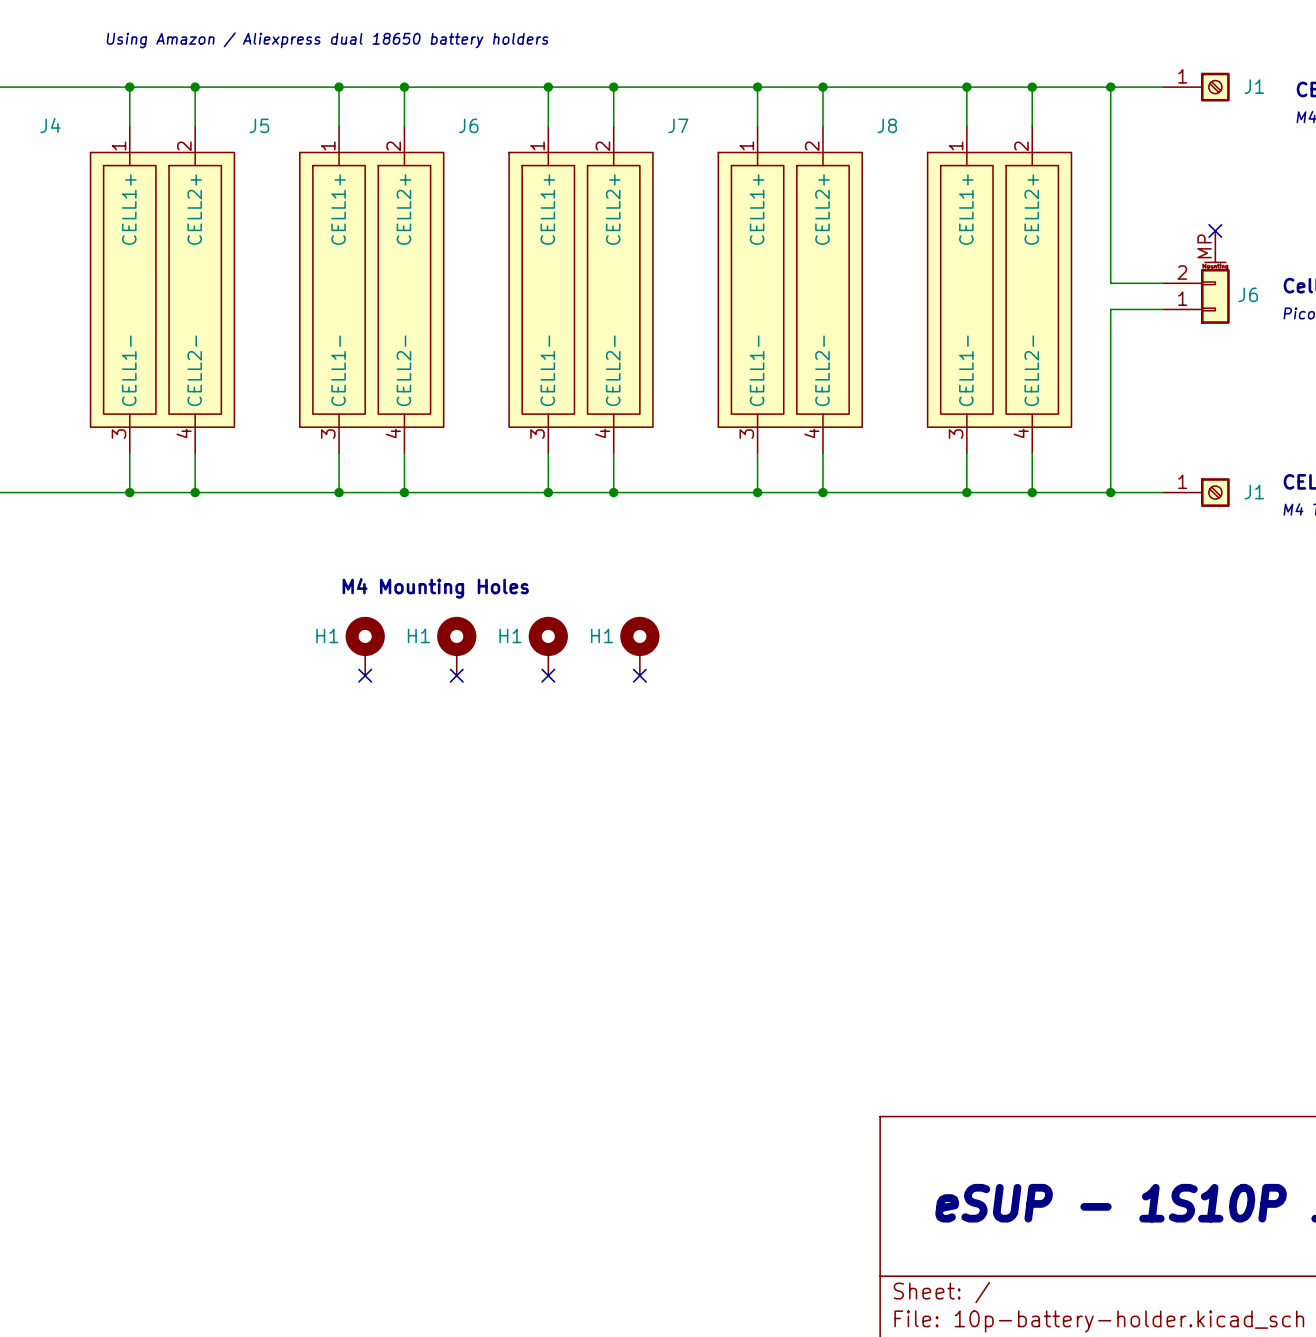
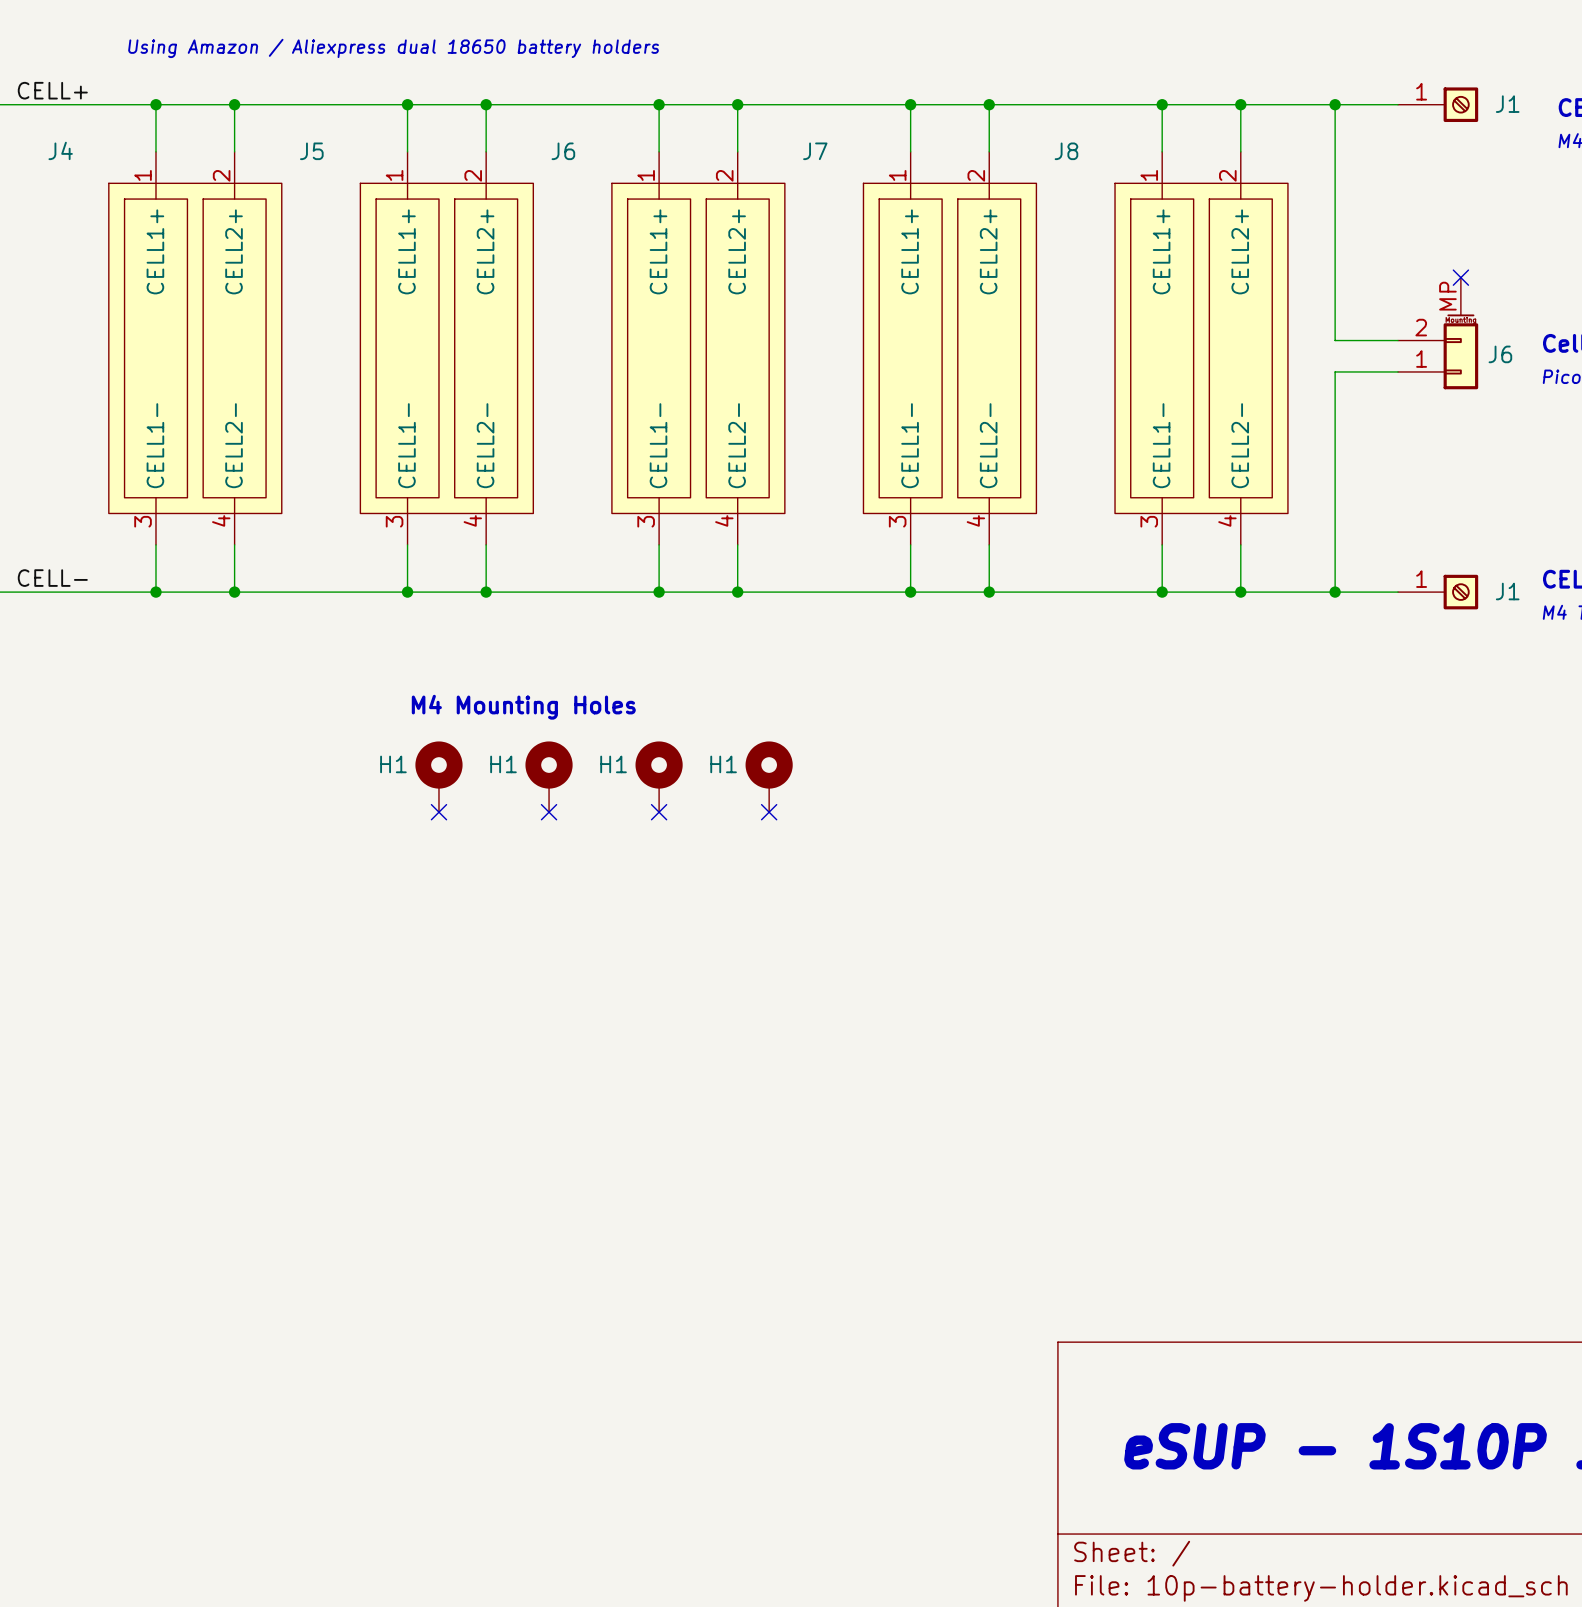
label: none -> CELL+ (52, 90)
label: none -> CELL- (52, 578)

